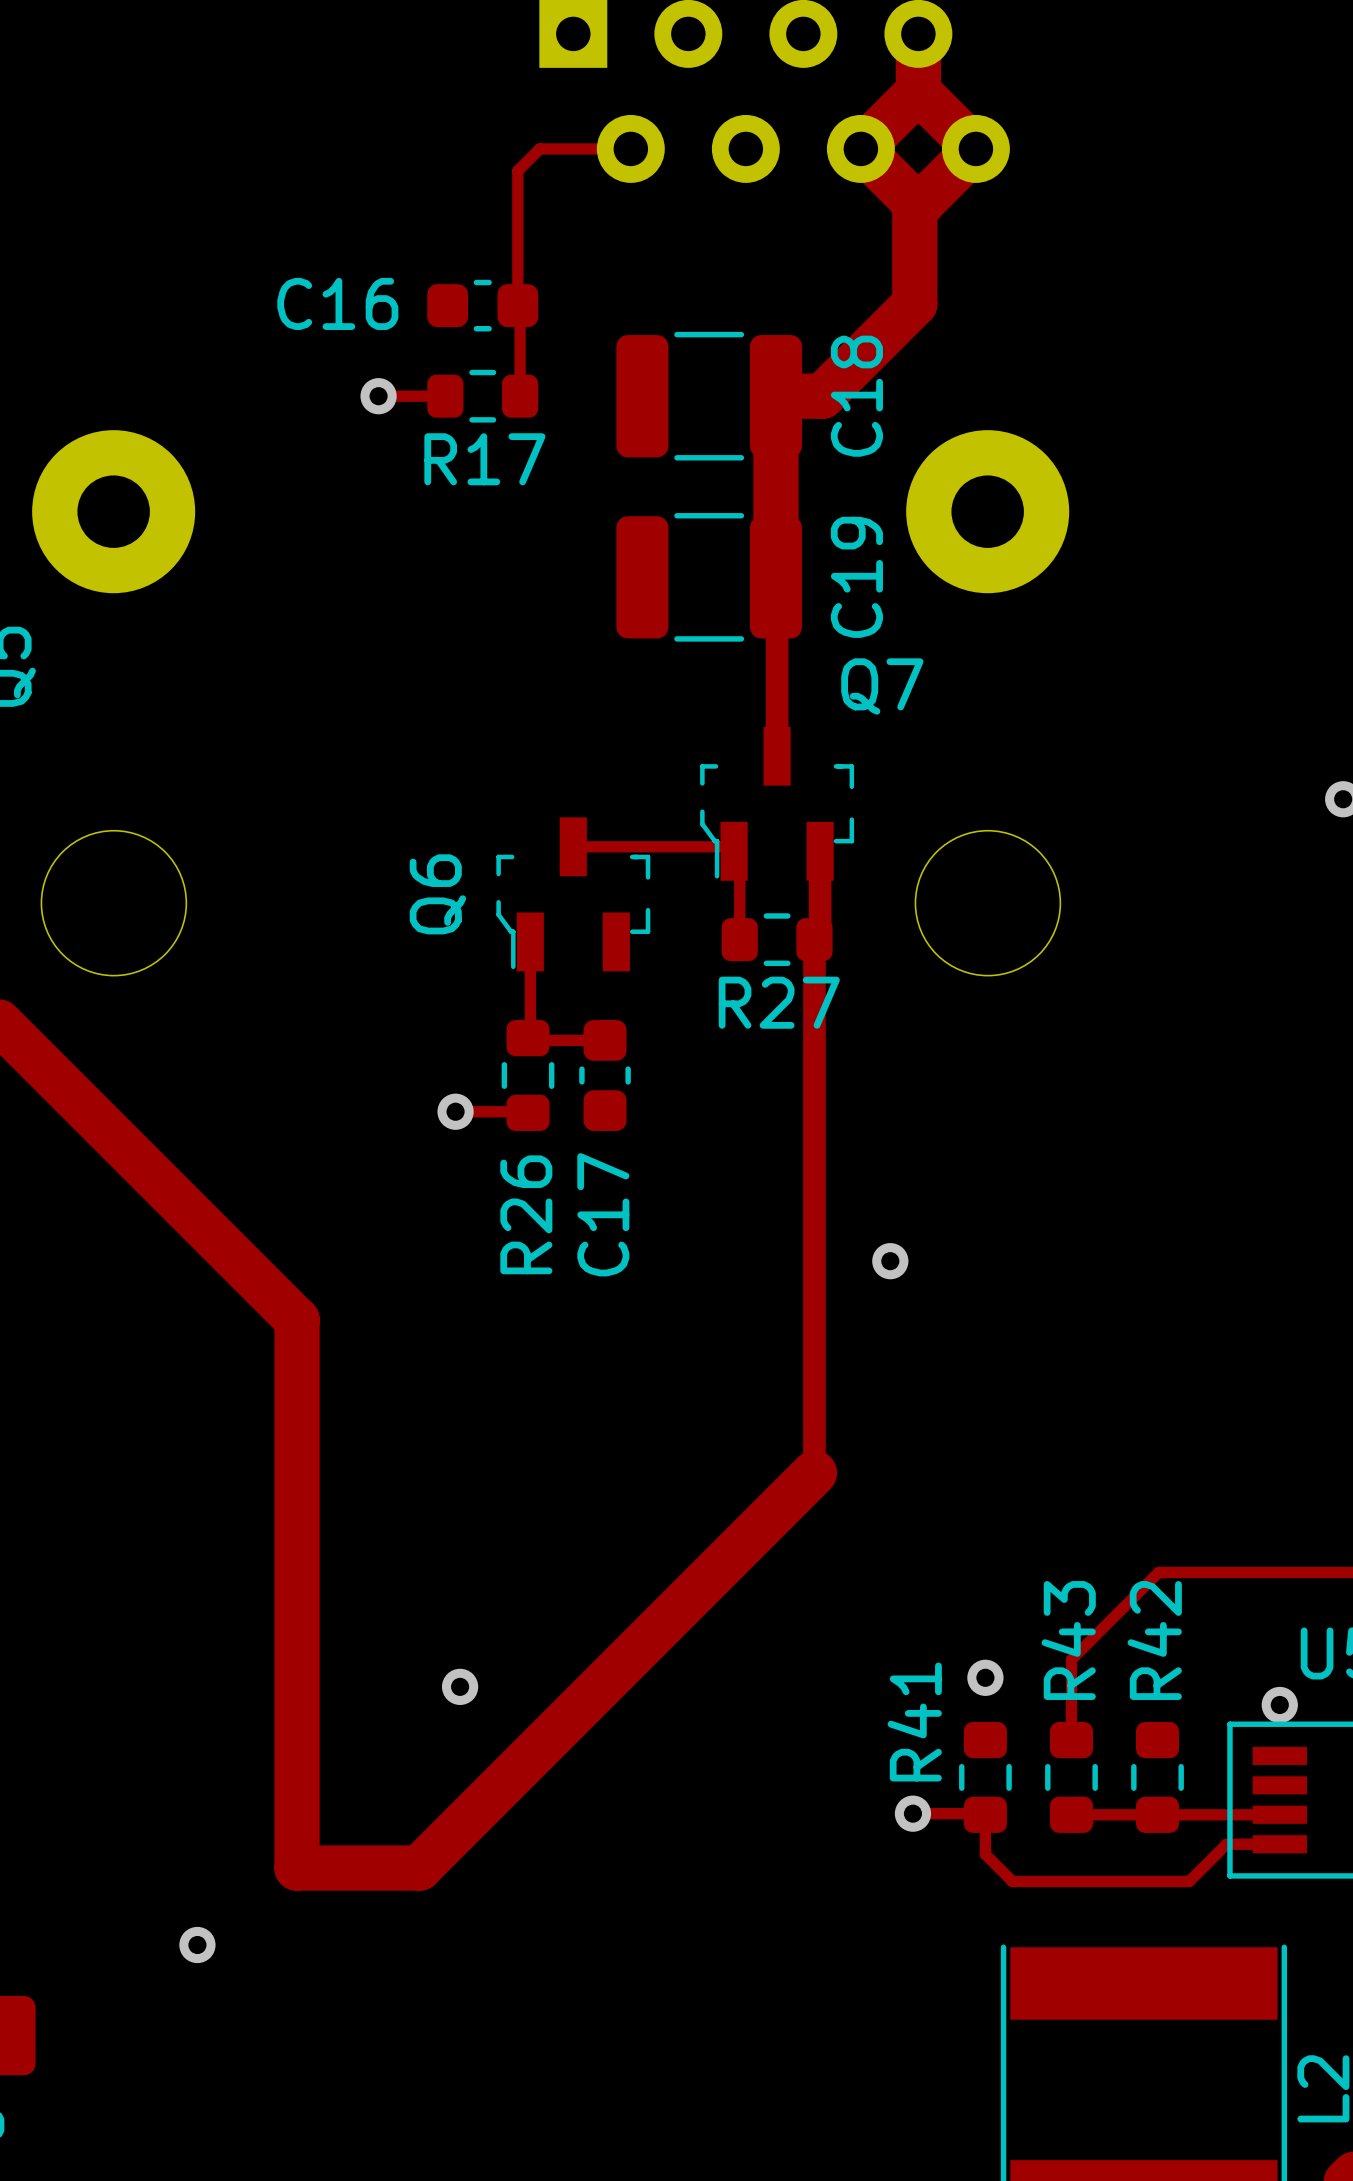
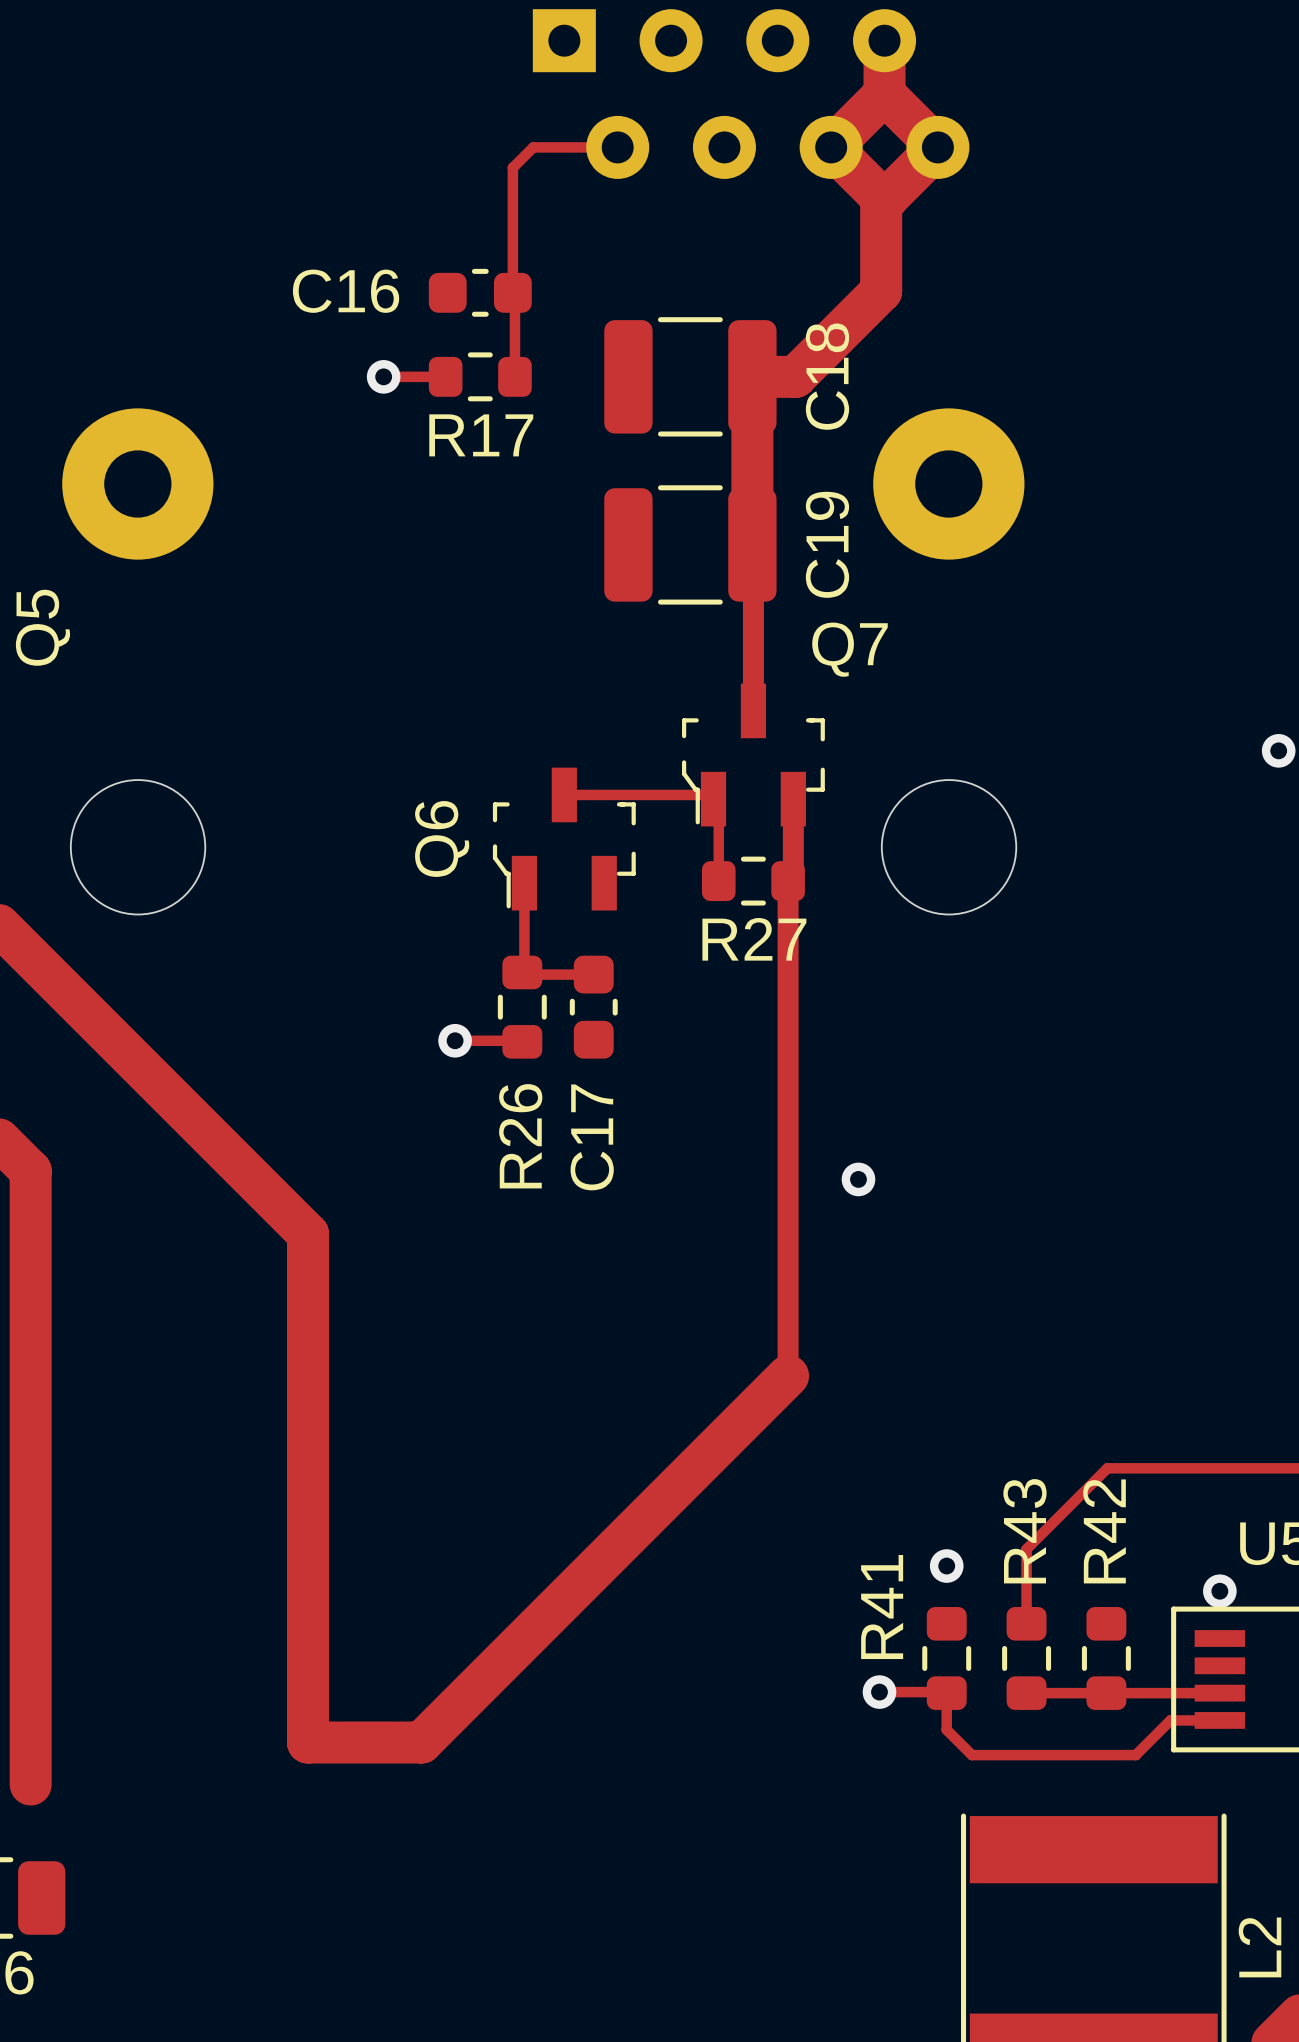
via: (460, 1686) -> none
via: (197, 1945) -> none

